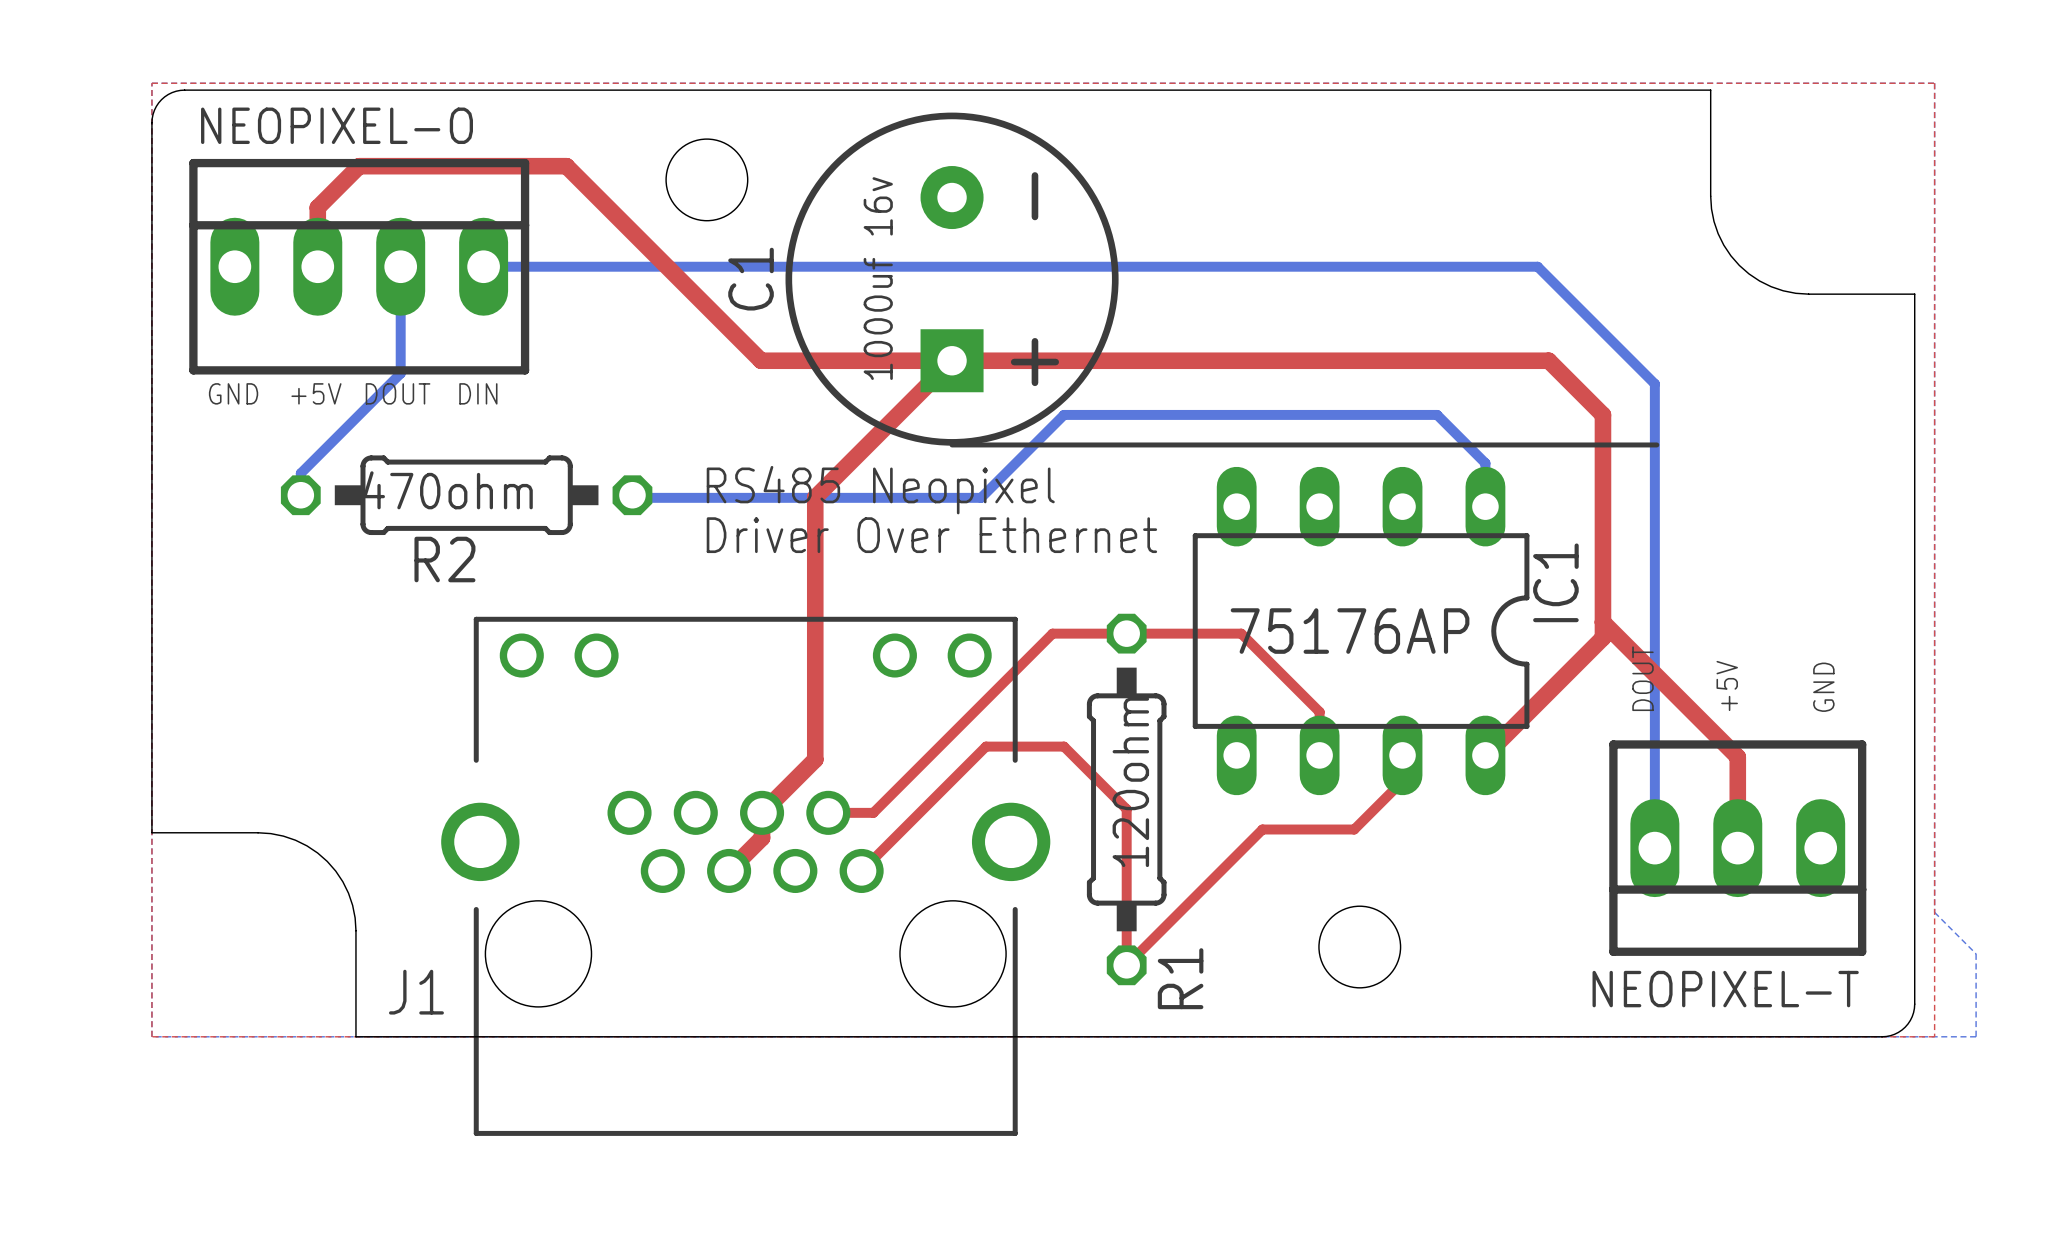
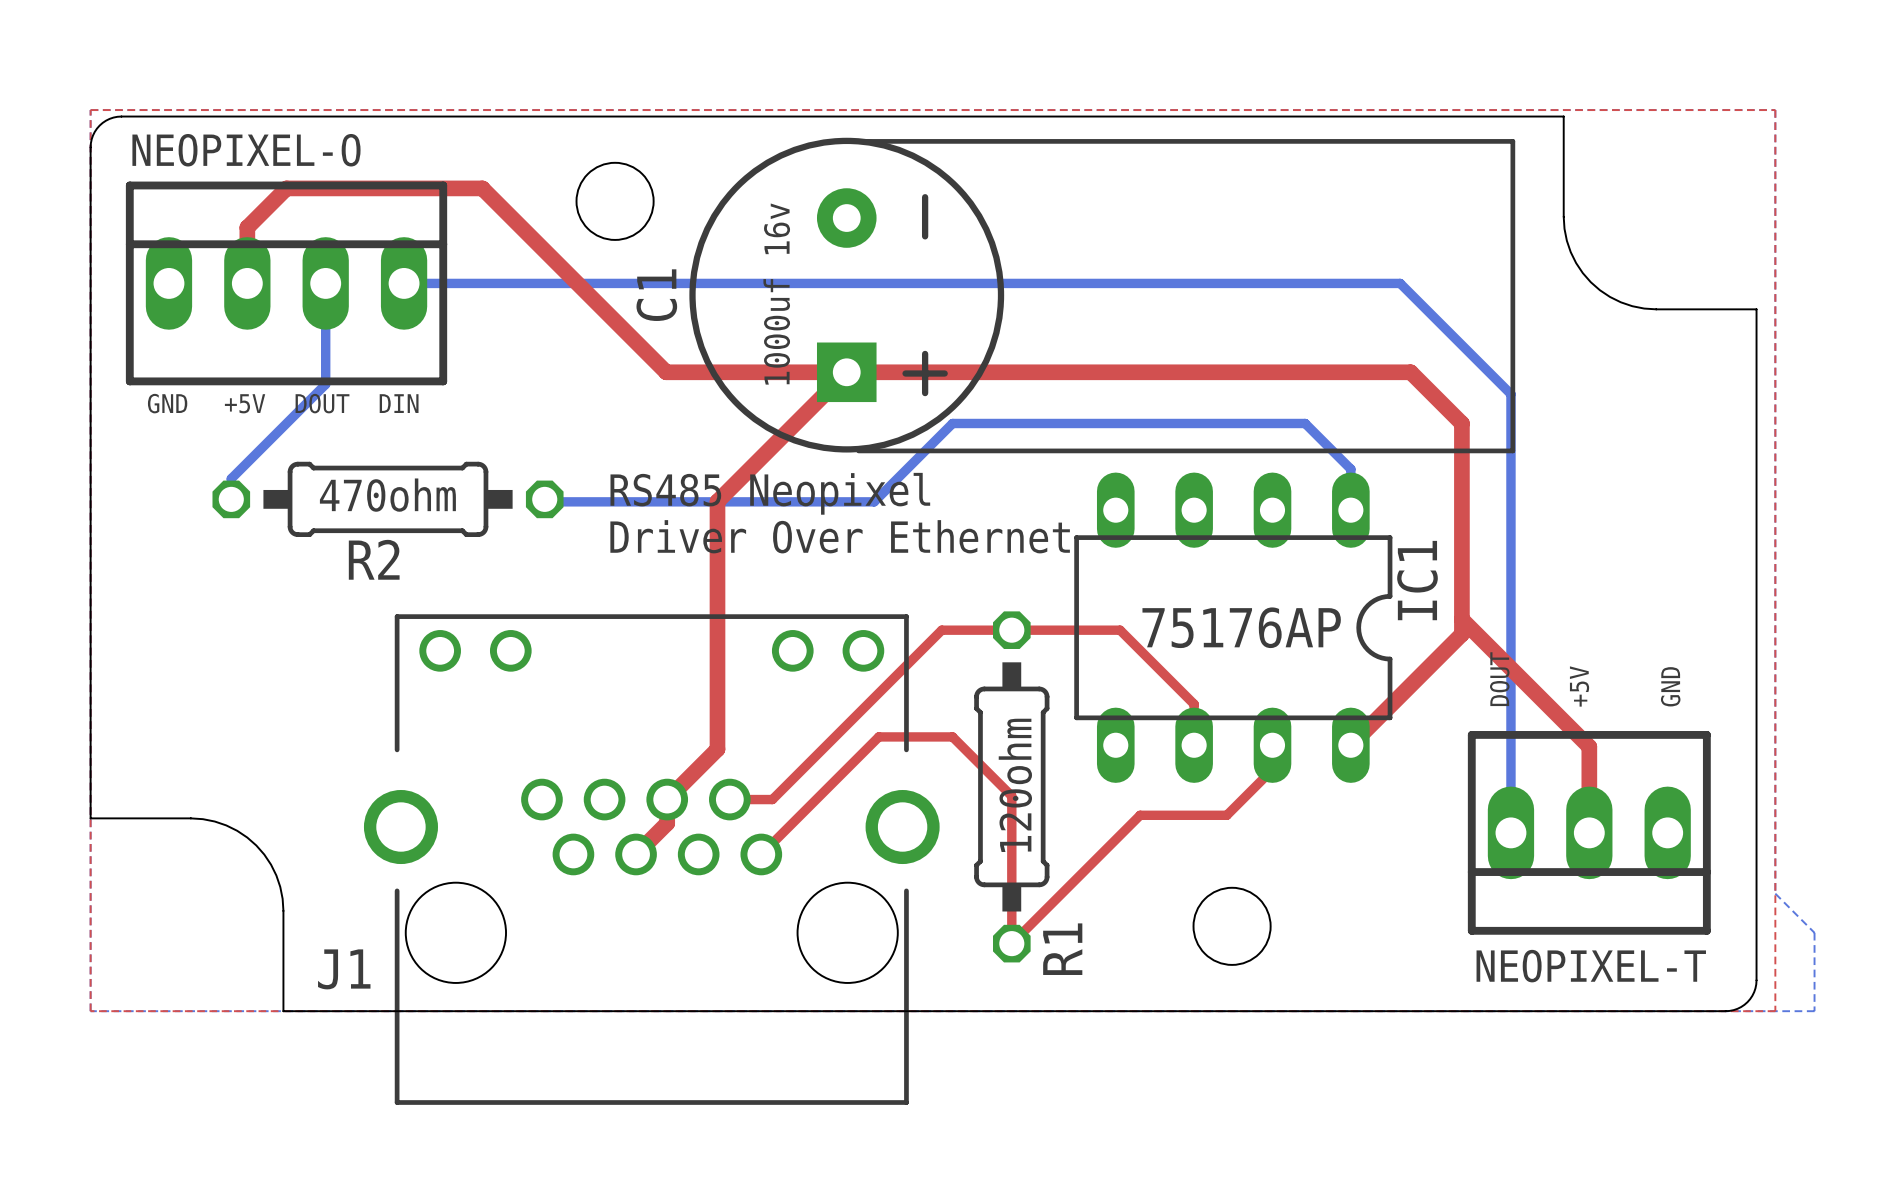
line: none -> (850, 141) (1512, 141) (1512, 450) (858, 450)
line: (952, 444) (1656, 444) -> none

